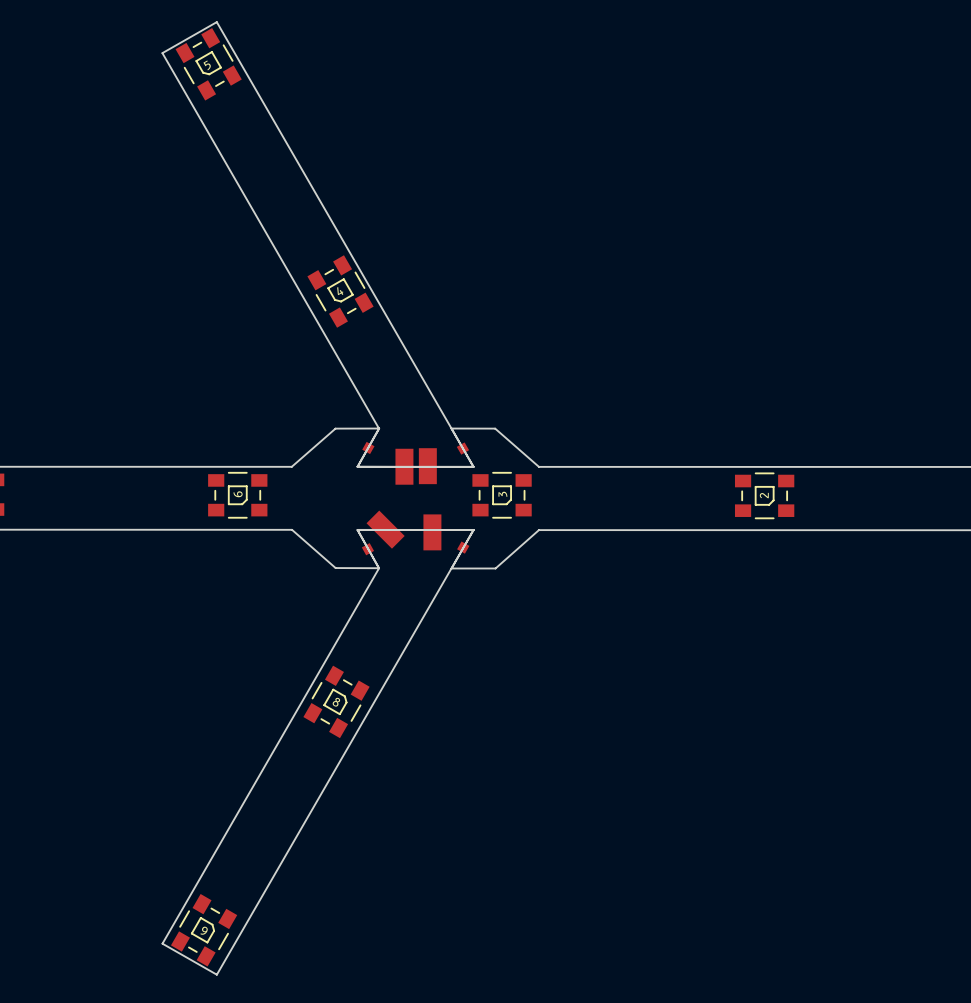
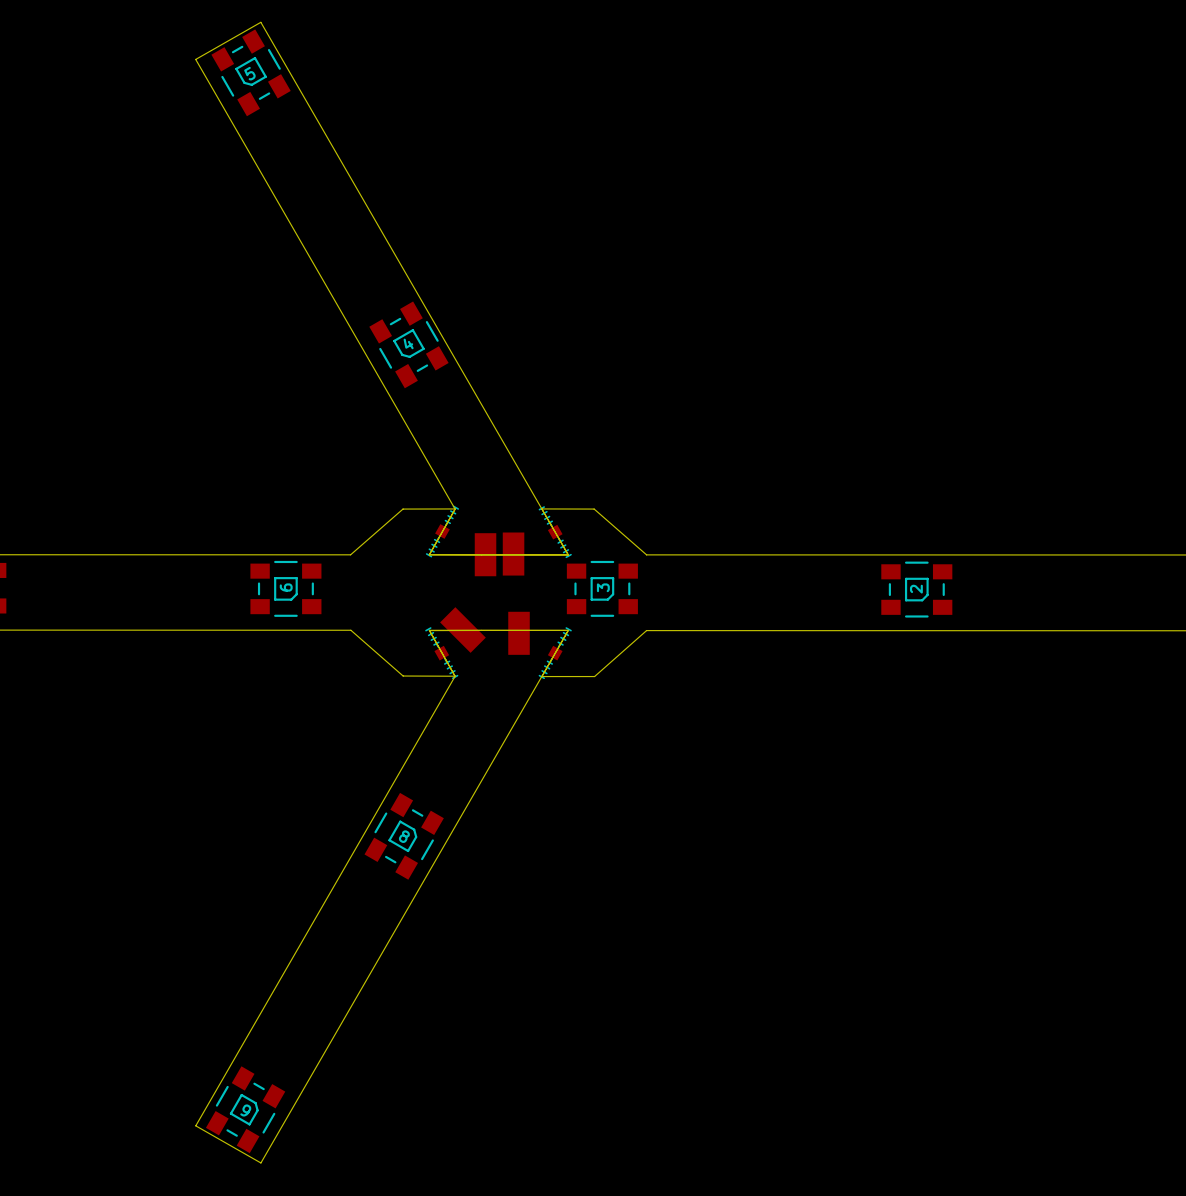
part footprint: [362, 441, 375, 455] -> [425, 505, 460, 558]
part footprint: [456, 442, 470, 455] -> [538, 506, 572, 559]
part footprint: [457, 541, 470, 554] -> [538, 627, 572, 680]
part footprint: [361, 543, 375, 556] -> [425, 627, 459, 680]

